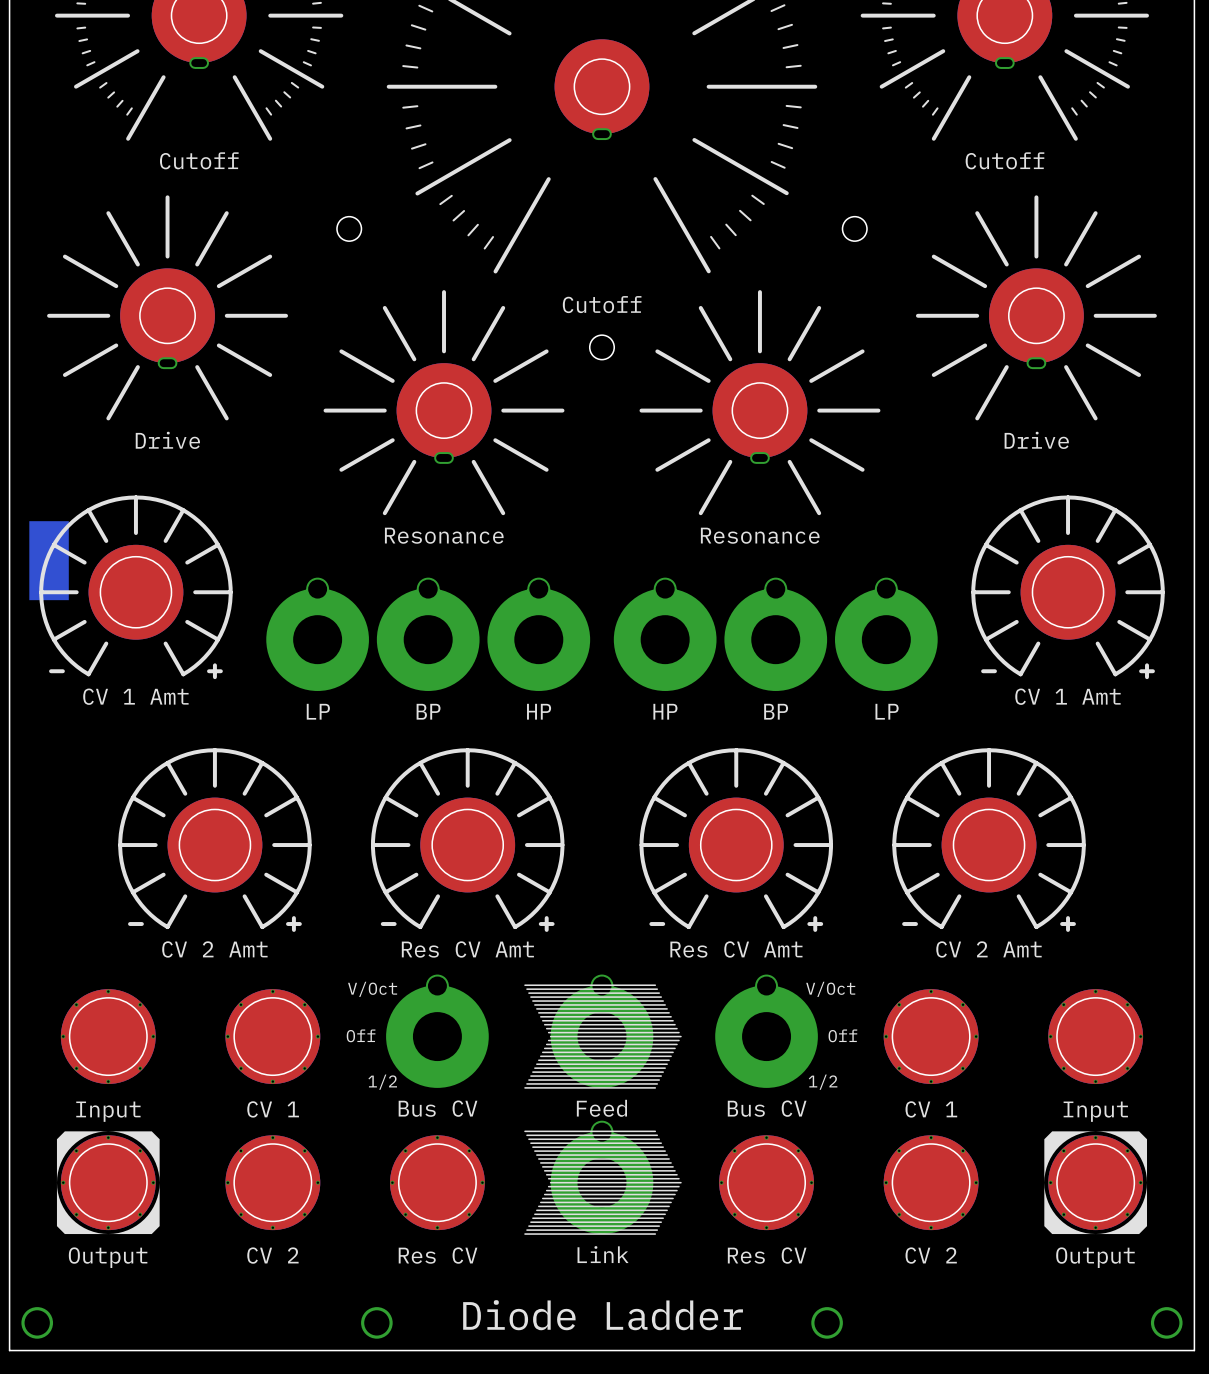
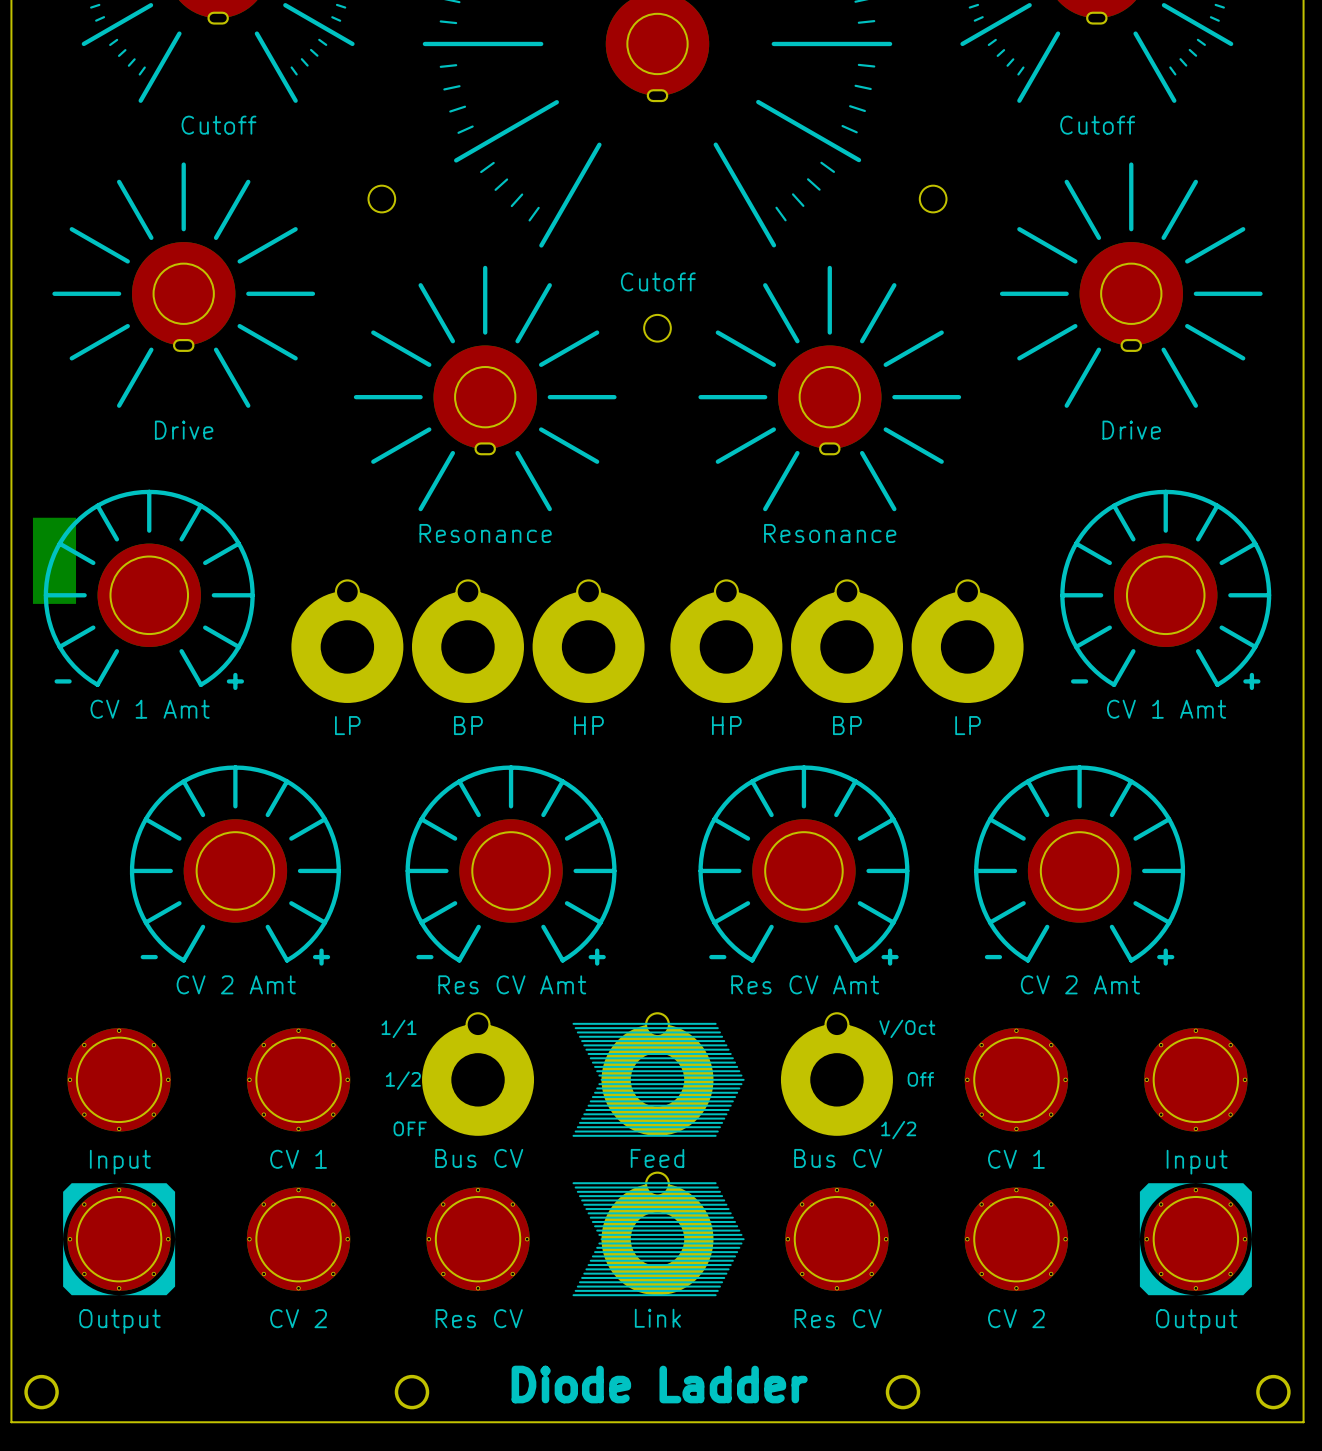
text: V/Oct (372, 989) -> 1/1 (399, 1028)
text: Off (361, 1035) -> 1/2 (403, 1080)
text: 1/2 (382, 1082) -> OFF (410, 1128)

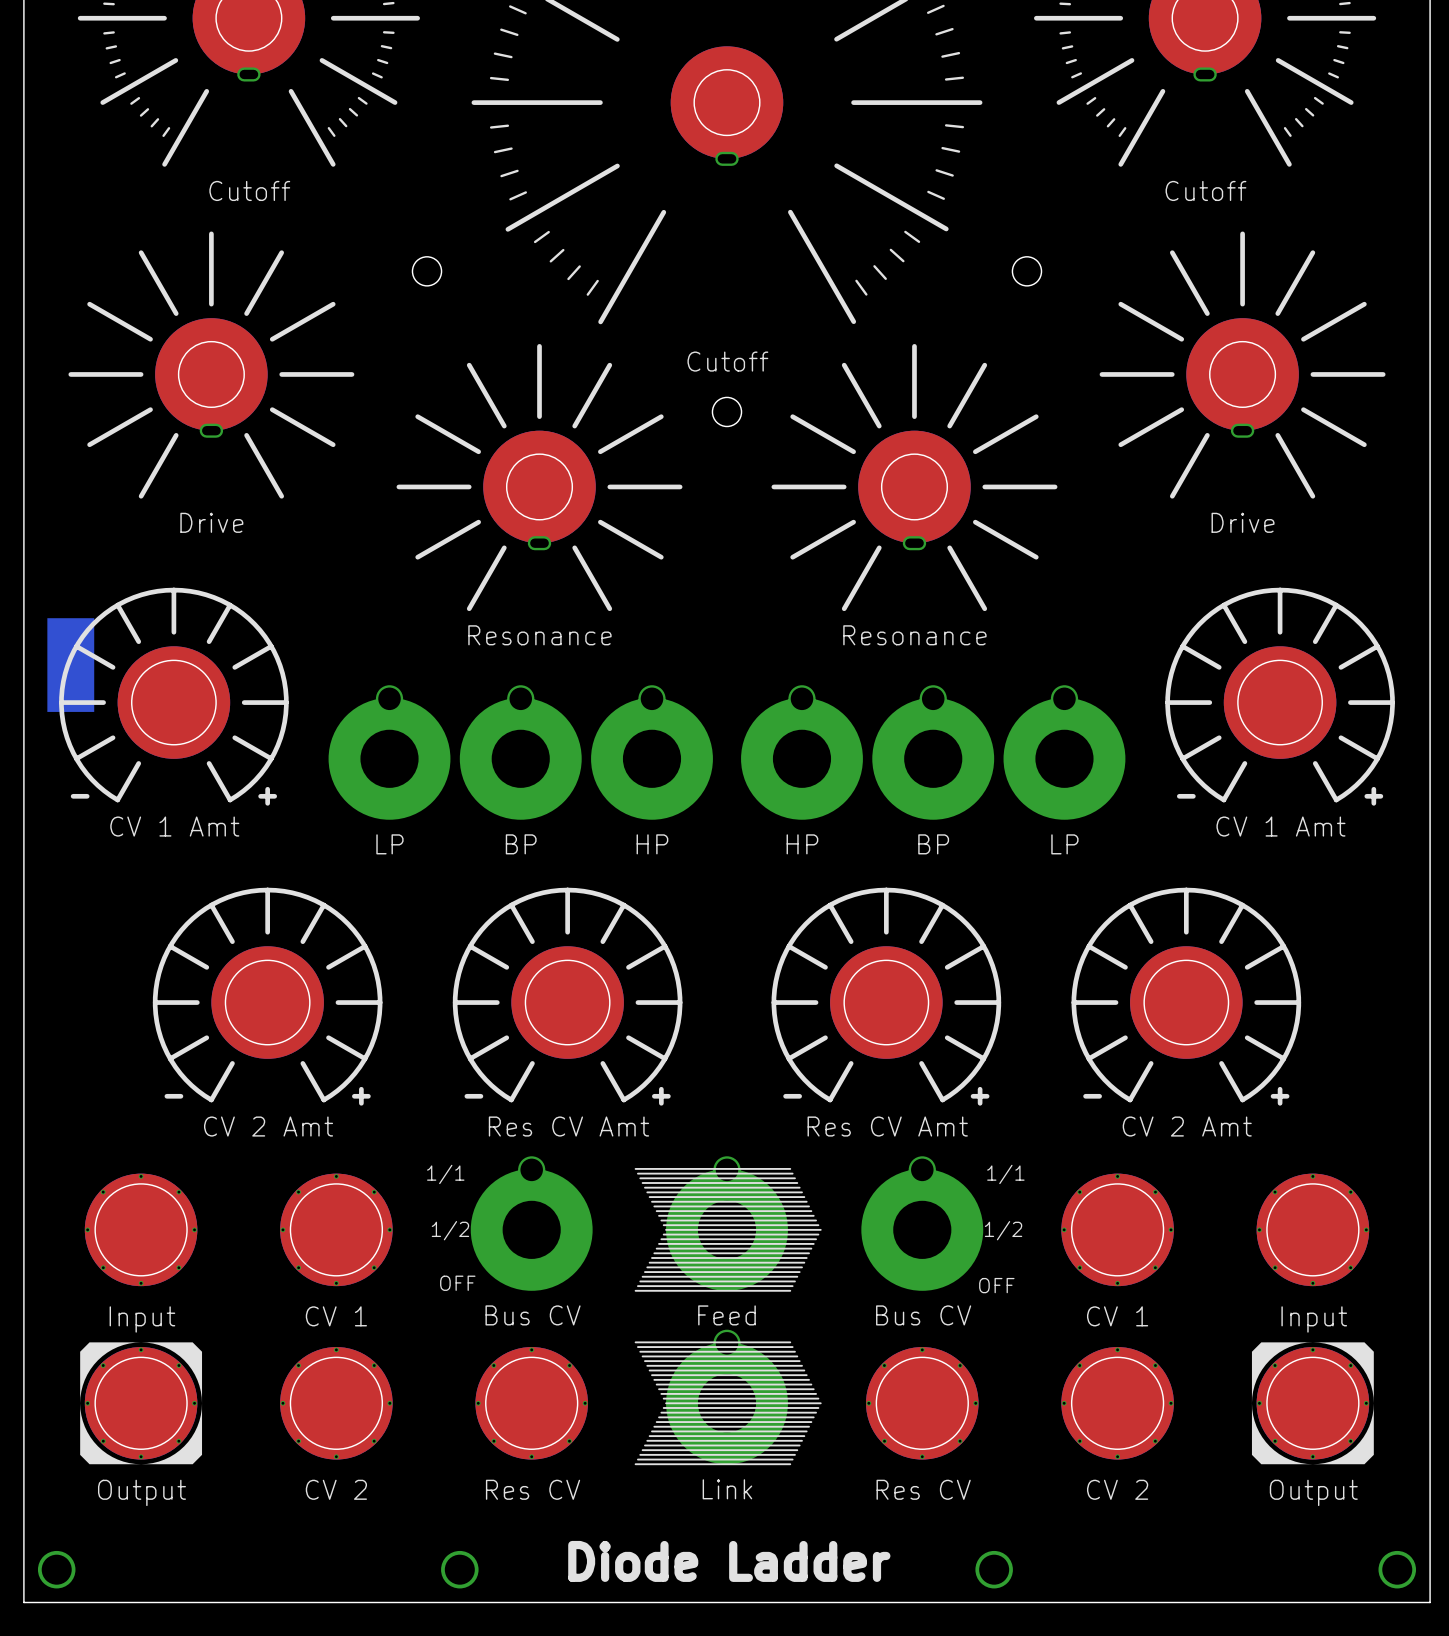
text: V/Oct (907, 1028) -> 1/1 (1005, 1174)
text: Off (920, 1079) -> 1/2 (1003, 1230)
text: 1/2 (898, 1130) -> OFF (996, 1285)

